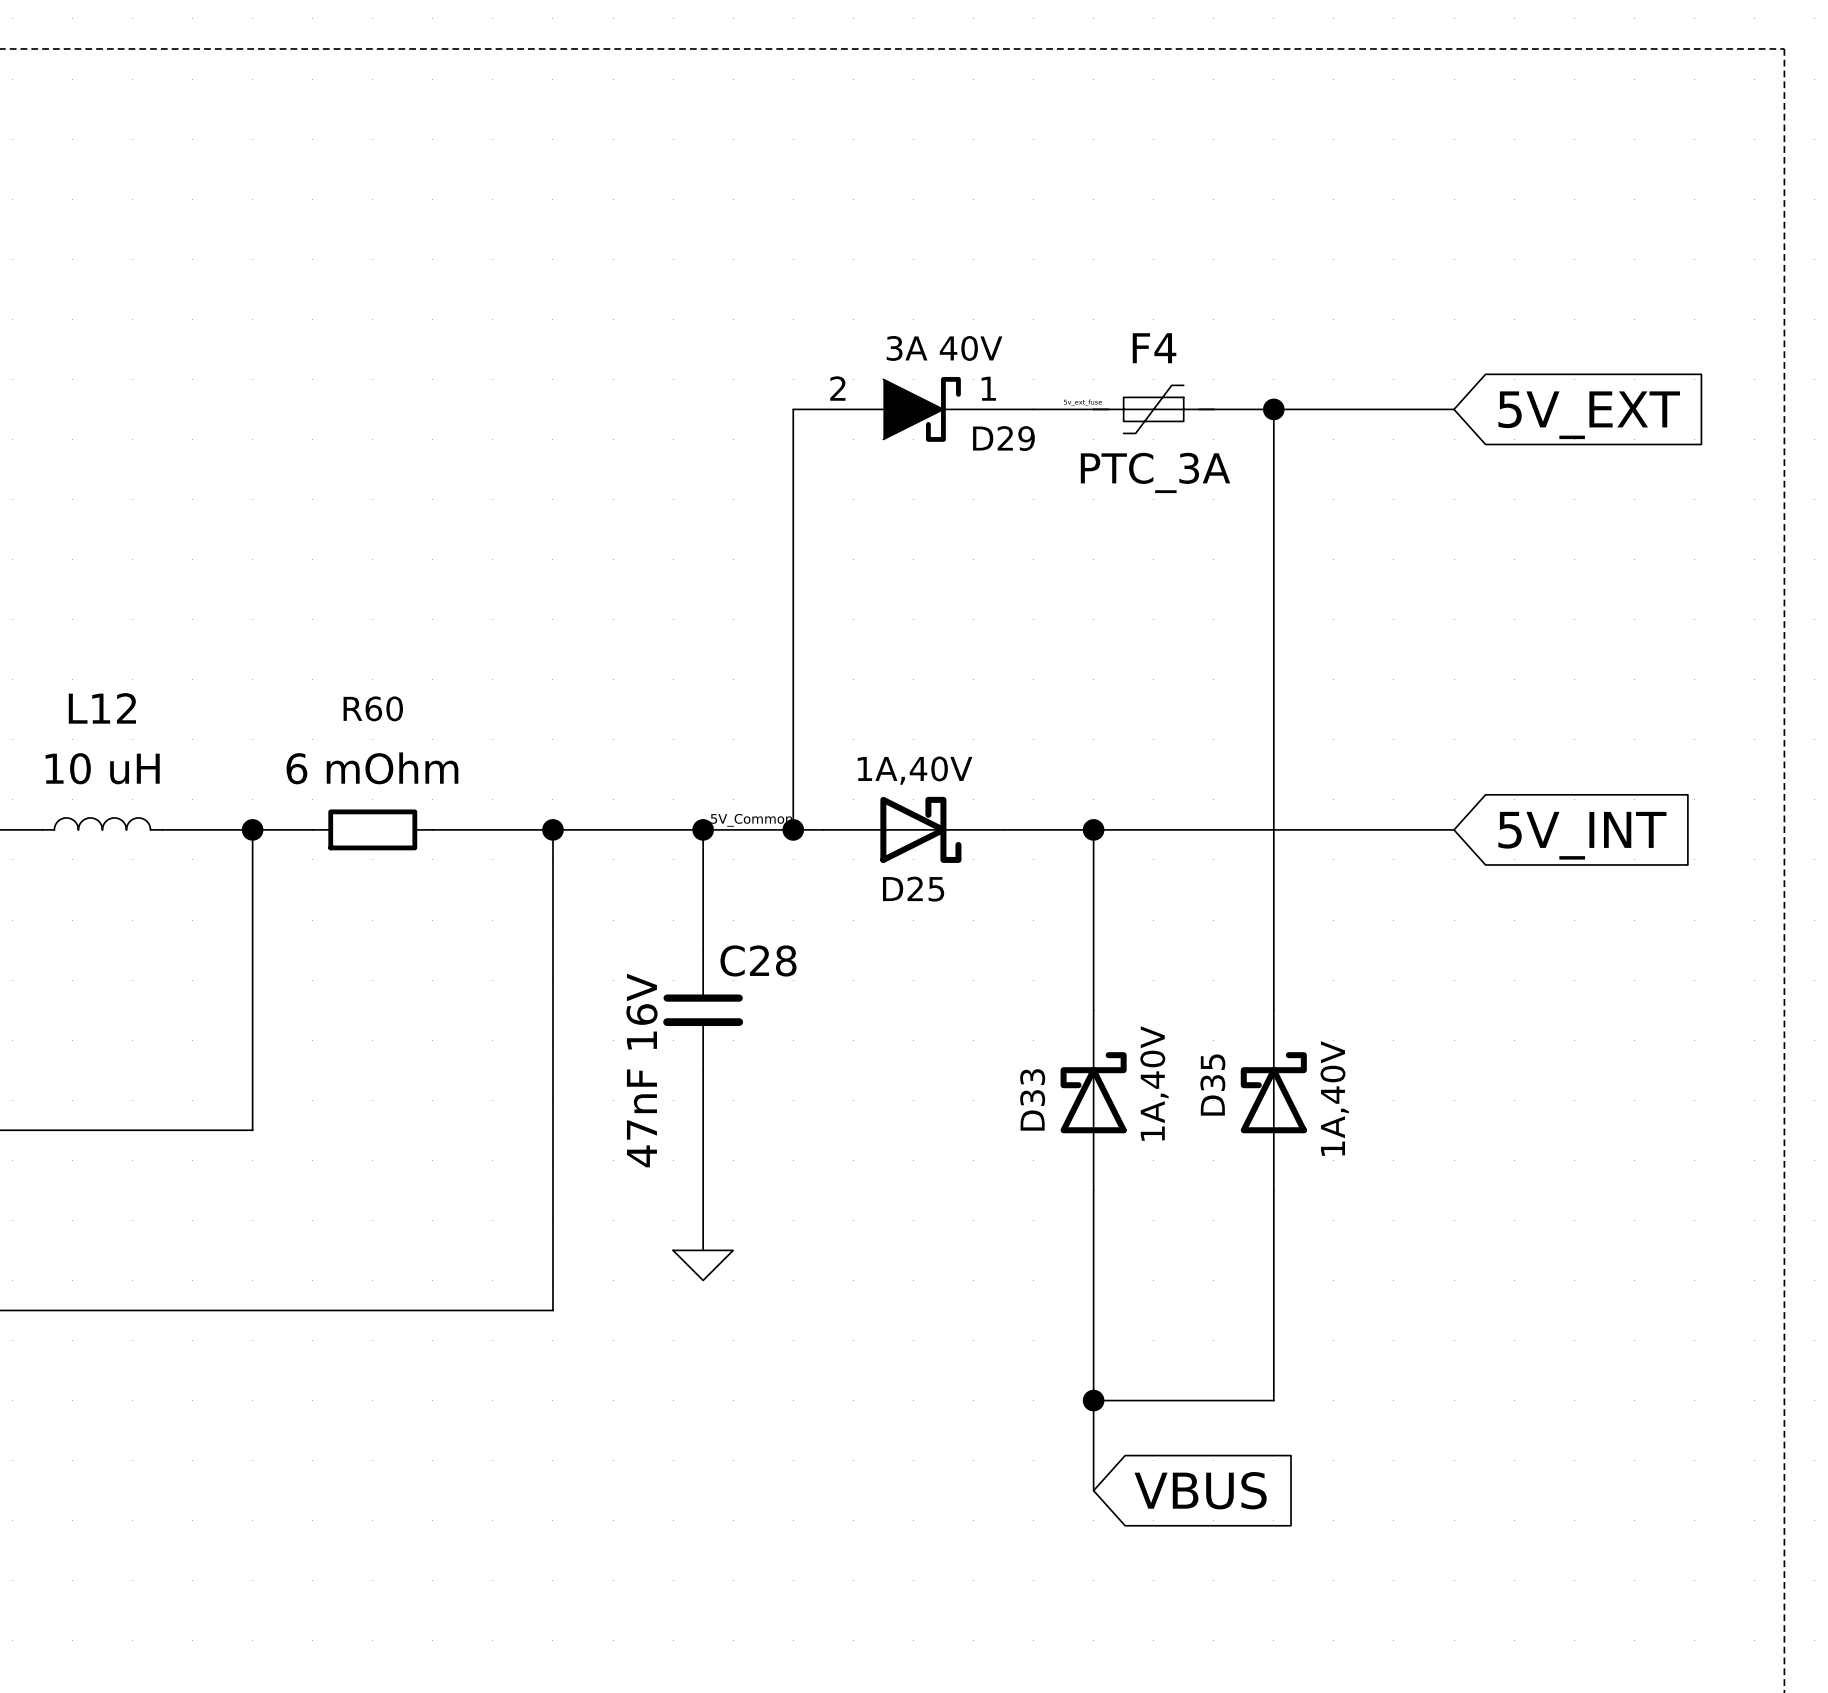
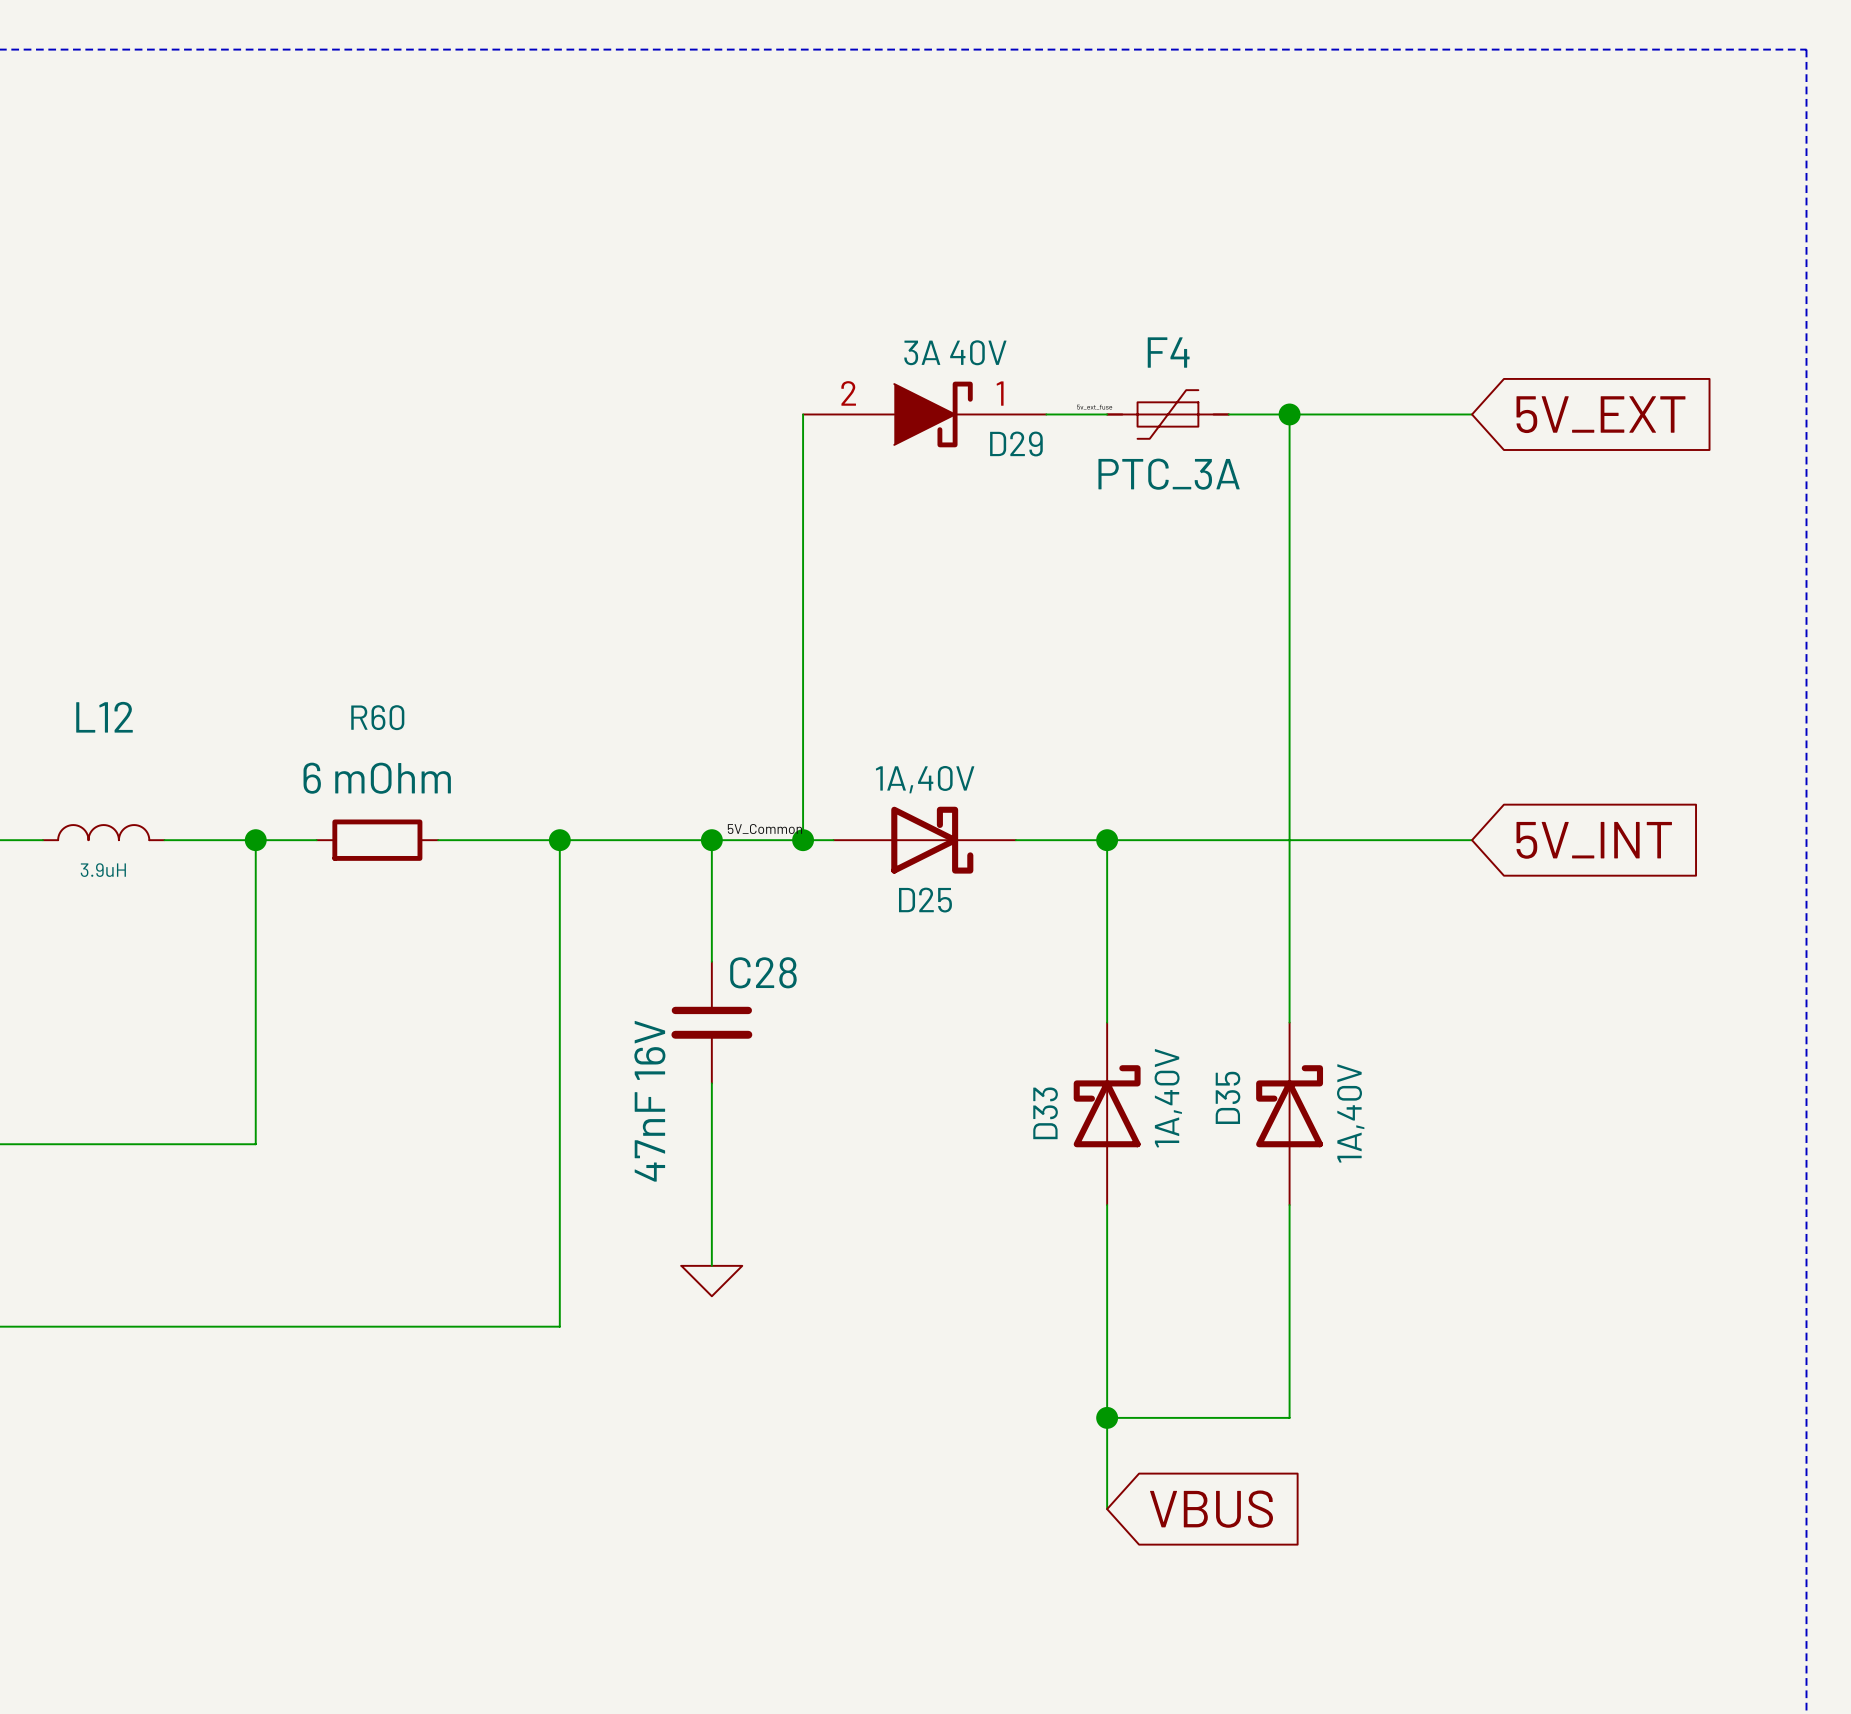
L12 value: 10 uH (102, 768) -> 3.9uH (103, 870)
L12 symbol: [42, 817, 163, 830] -> [42, 825, 165, 841]

